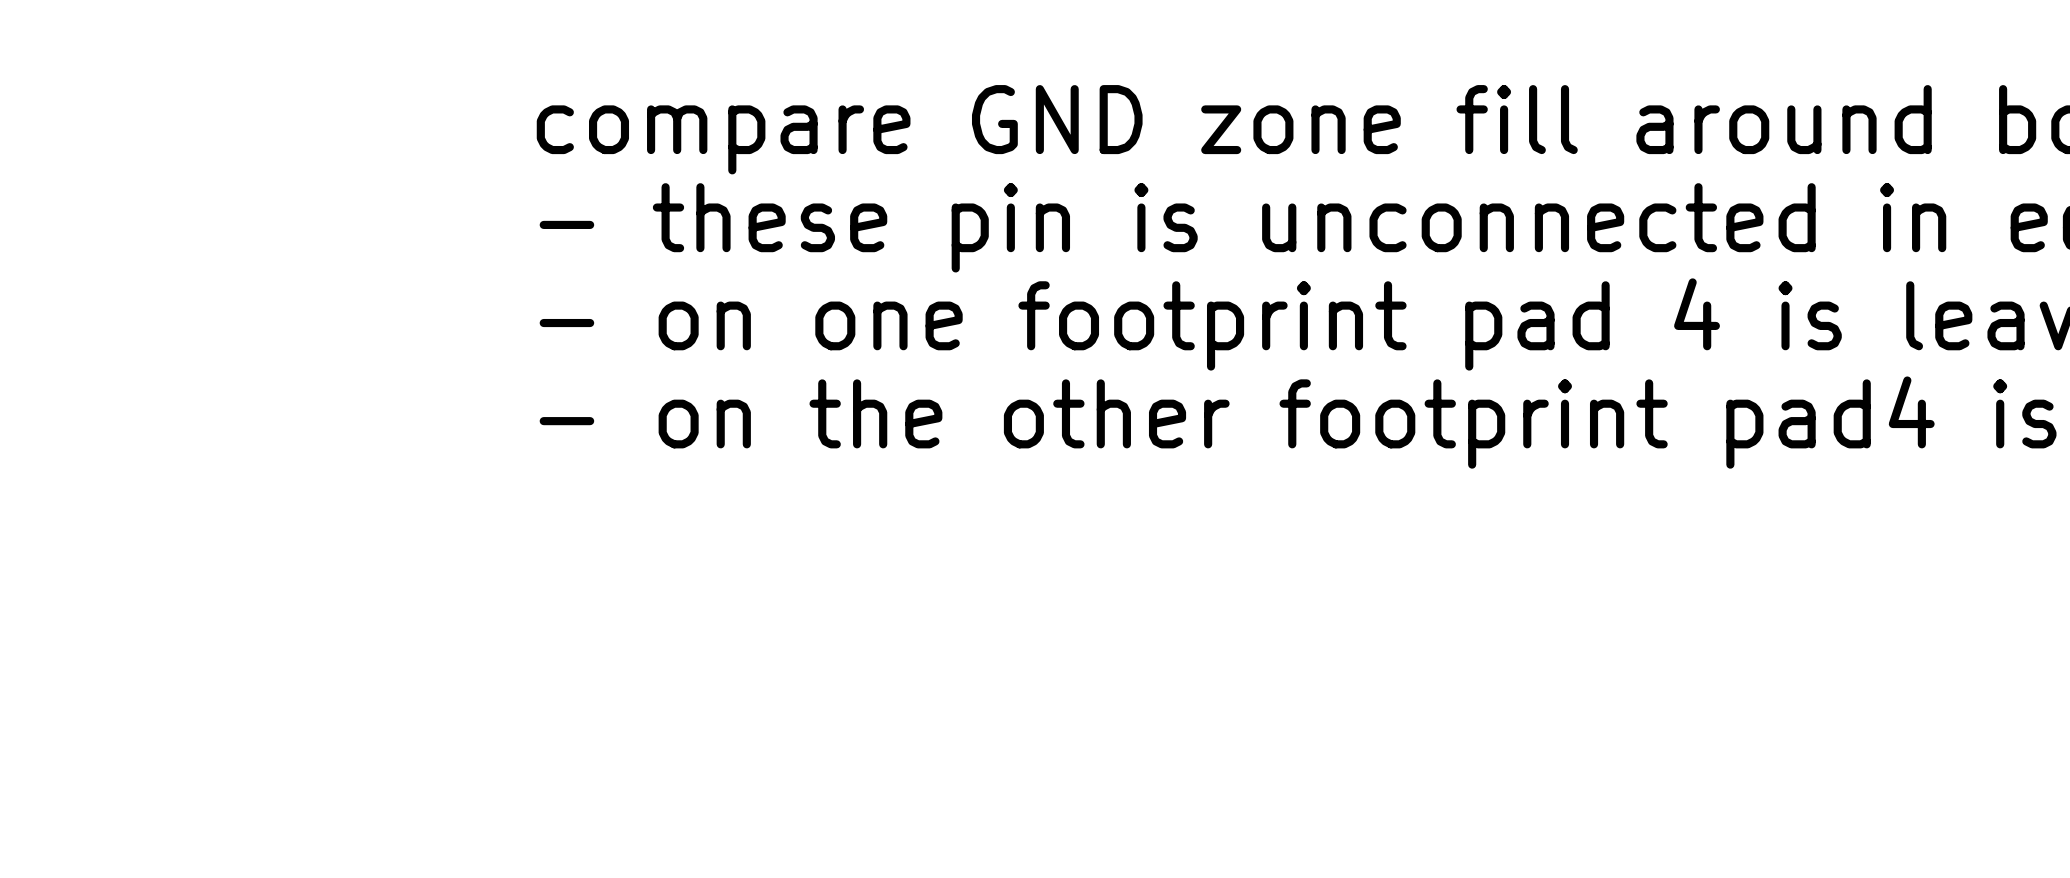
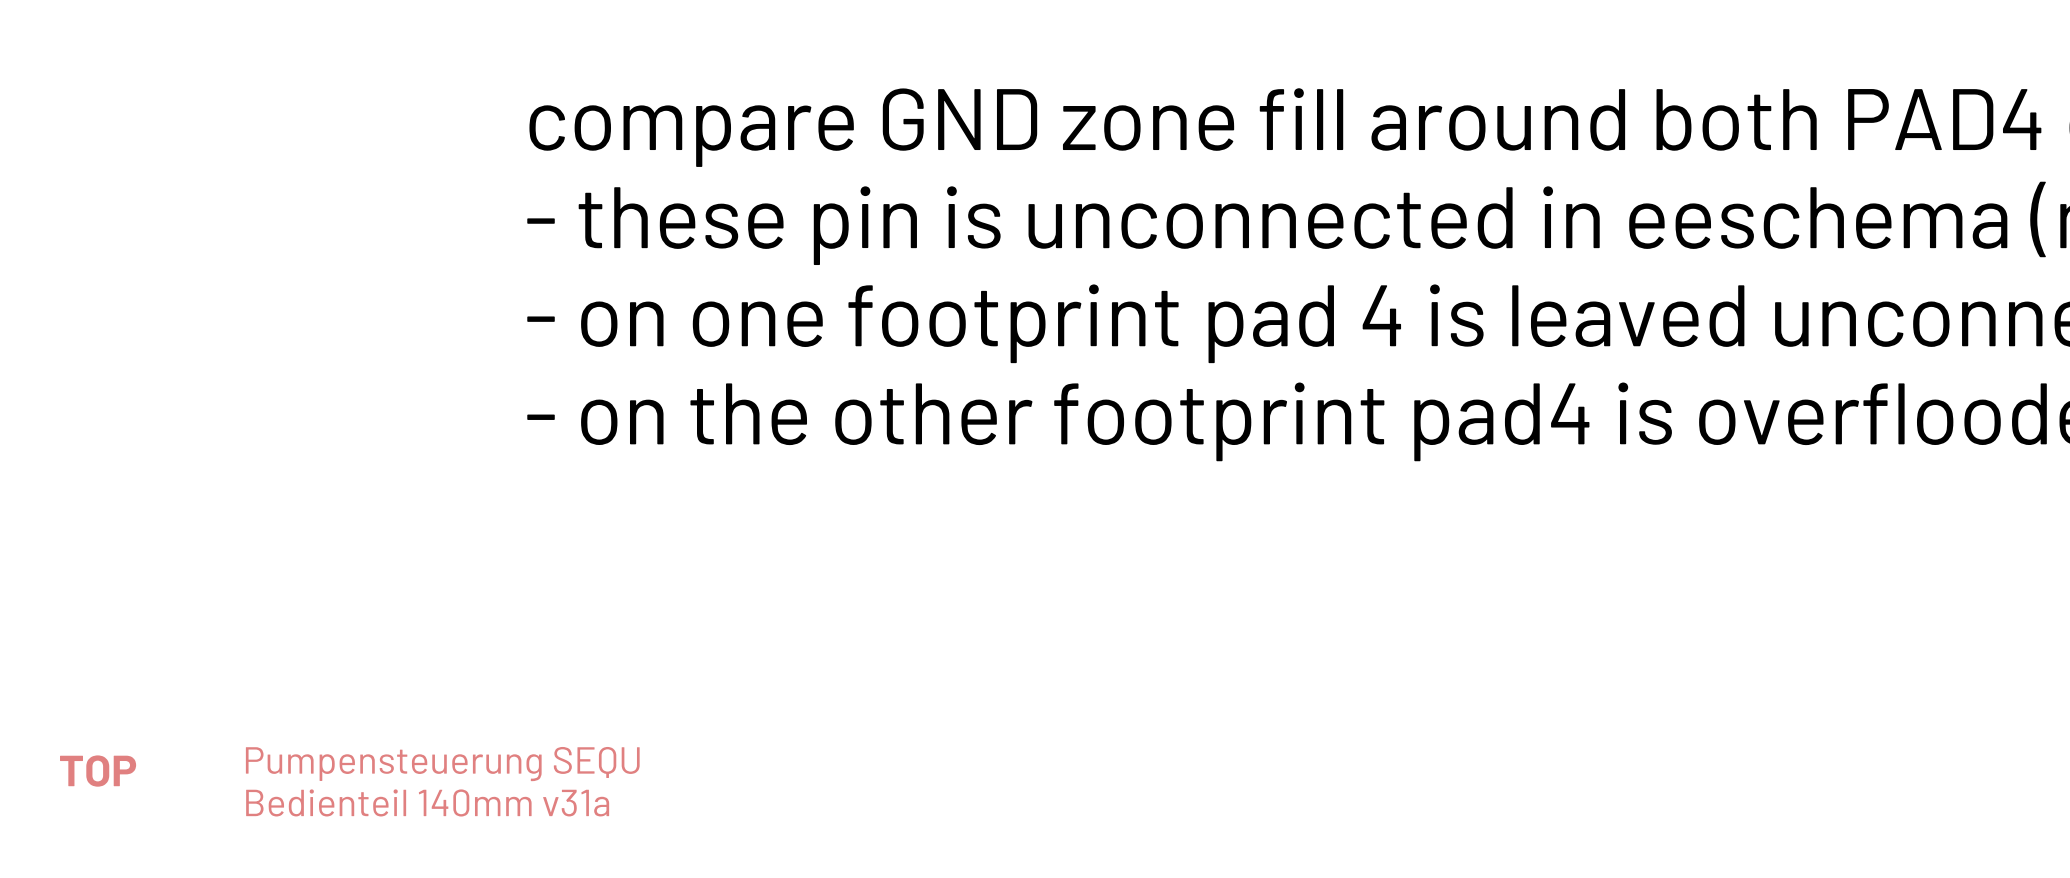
text: none -> Pumpensteuerung SEQU (442, 764)
text: none -> TOP (98, 771)
text: none -> Bedienteil 140mm v31a (427, 802)

